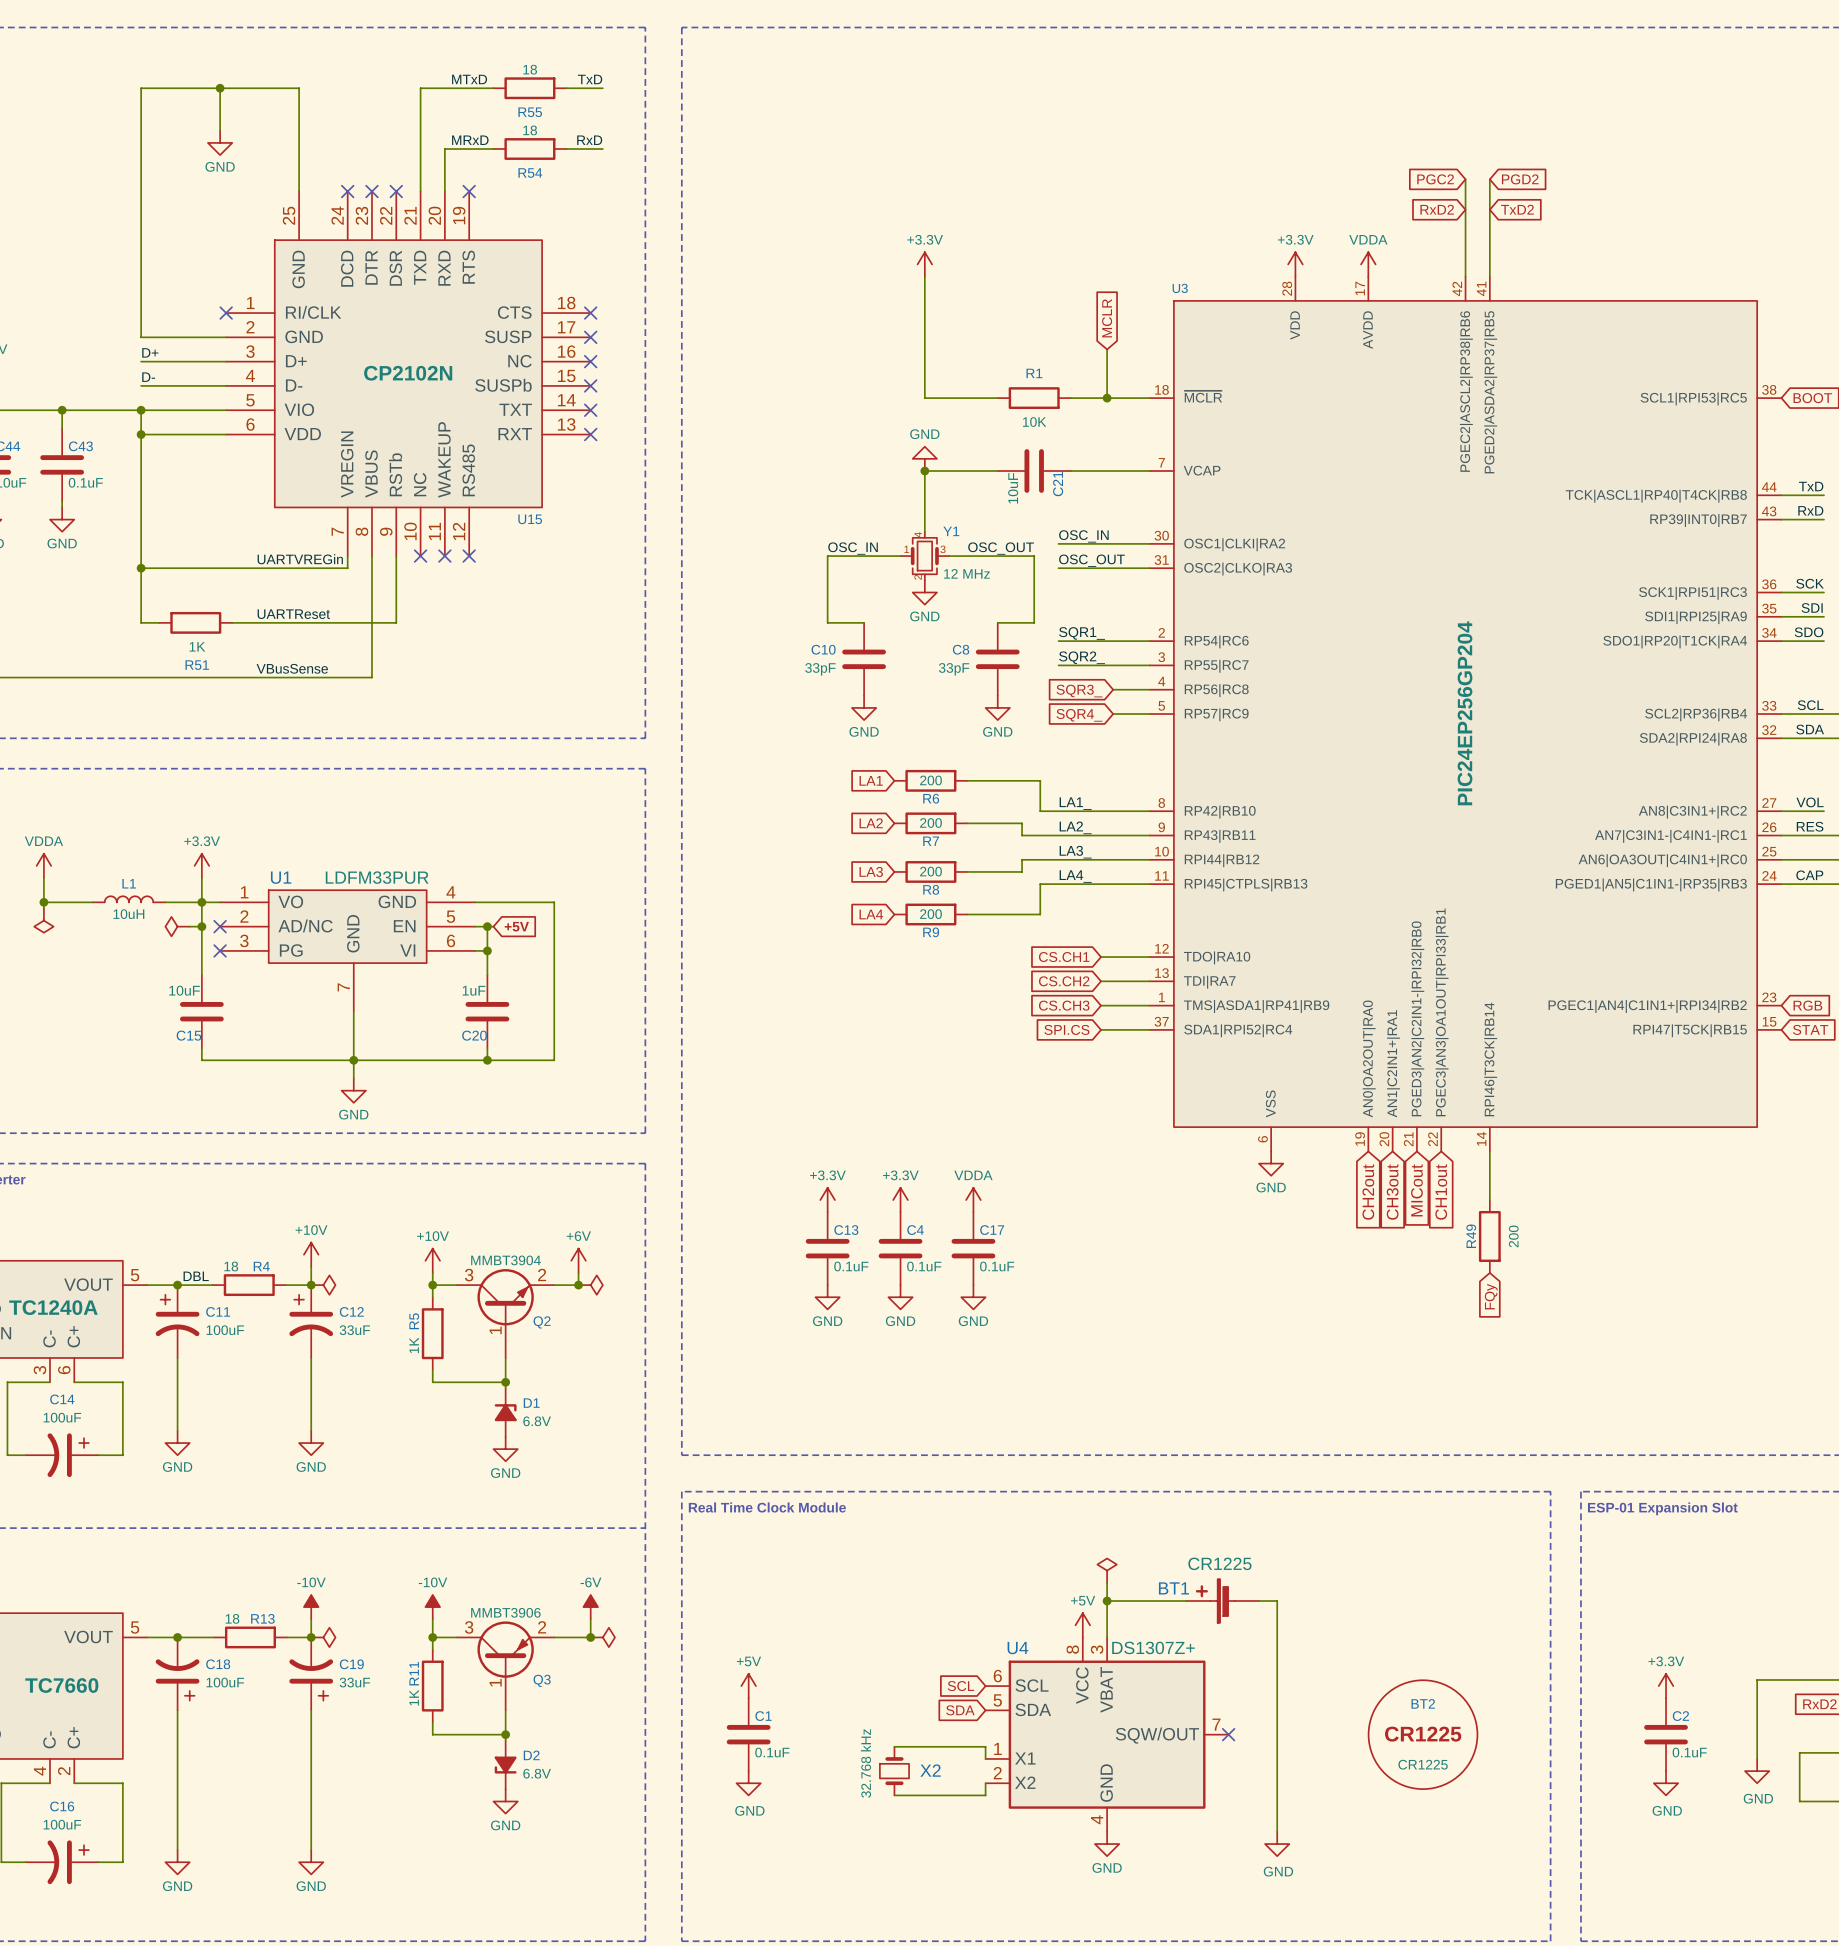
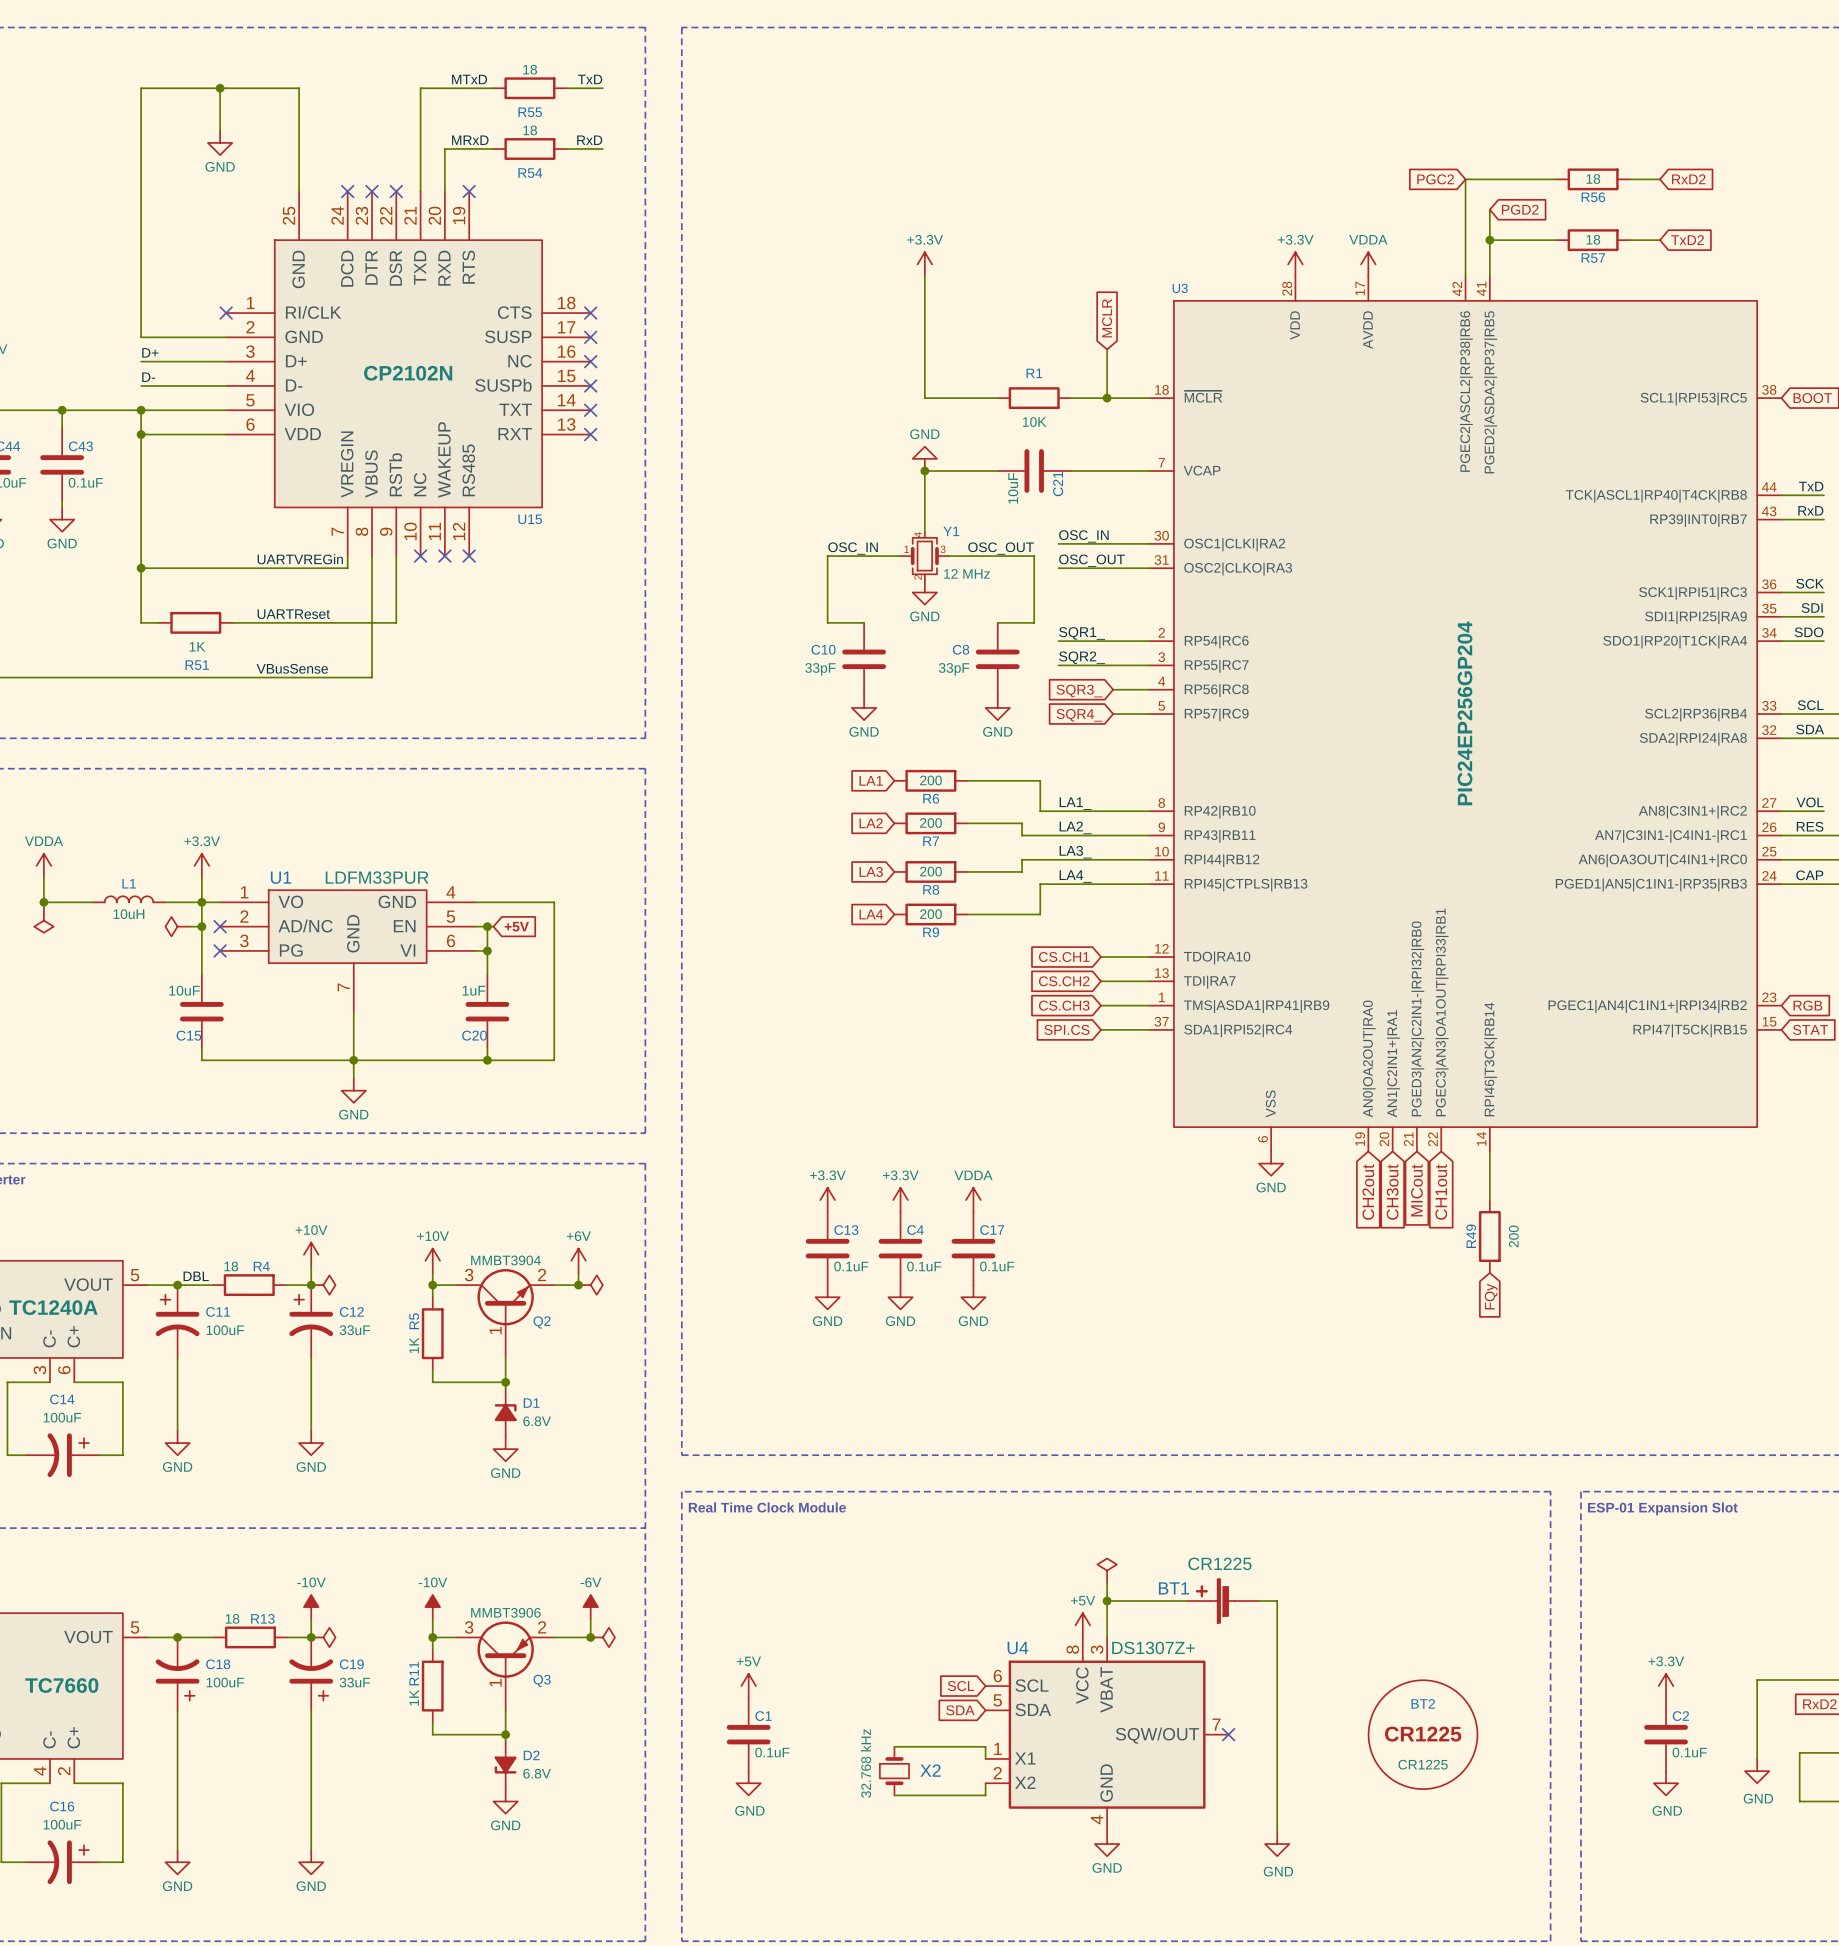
wire: none -> (1465, 179) (1556, 179)
wire: (1489, 179) (1489, 209) -> none
global label: PGD2 (1520, 179) -> none
R56: none -> 18 (1593, 179)
wire: none -> (1629, 179) (1659, 179)
global label rotation: 0° (1437, 209) -> 180° (1688, 179)
global label position: RxD2 (1437, 209) -> RxD2 (1688, 179)
global label: TxD2 (1517, 209) -> PGD2 (1520, 209)
wire: none -> (1489, 240) (1556, 240)
junction: none -> (1489, 240)
R57: none -> 18 (1593, 240)
wire: none -> (1629, 240) (1659, 240)
global label: none -> TxD2 (1687, 240)

